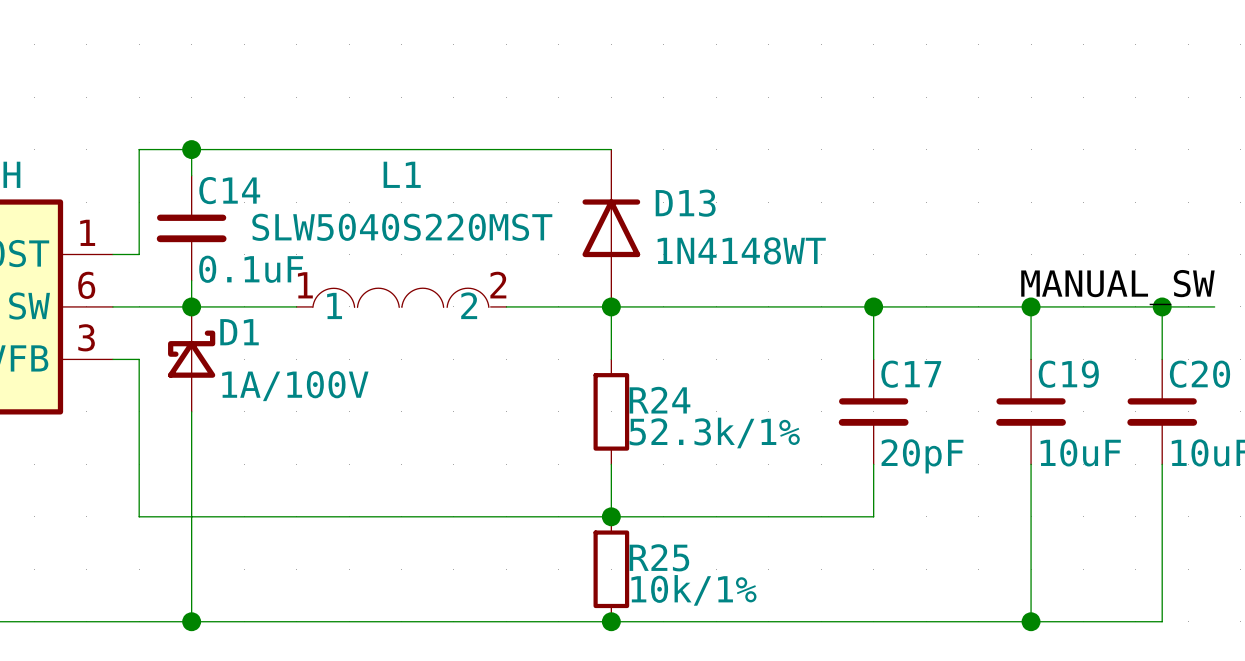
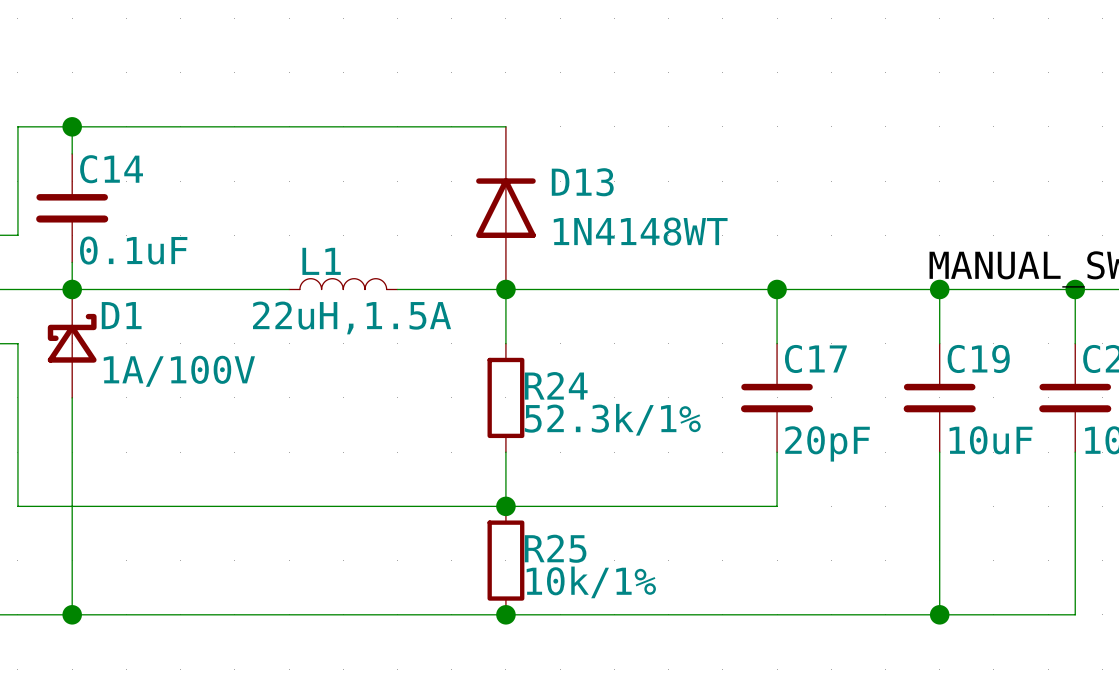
L1 name position: L1 (402, 174) -> L1 (321, 261)
L1 value: SLW5040S220MST (402, 227) -> 22uH,1.5A (352, 317)
L1 symbol: [296, 288, 507, 308] -> [289, 278, 398, 290]
wire: none -> (180, 289) (289, 289)

